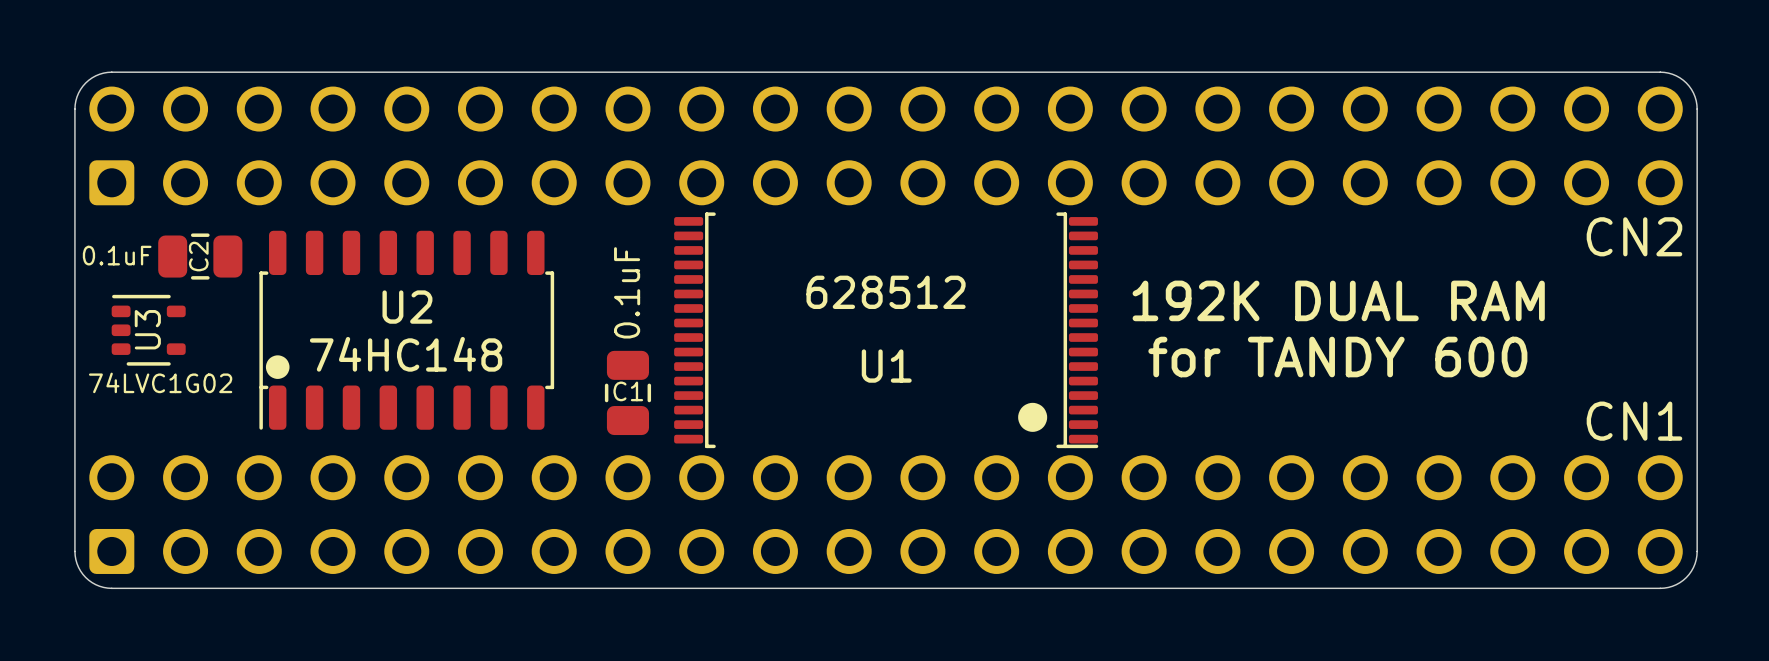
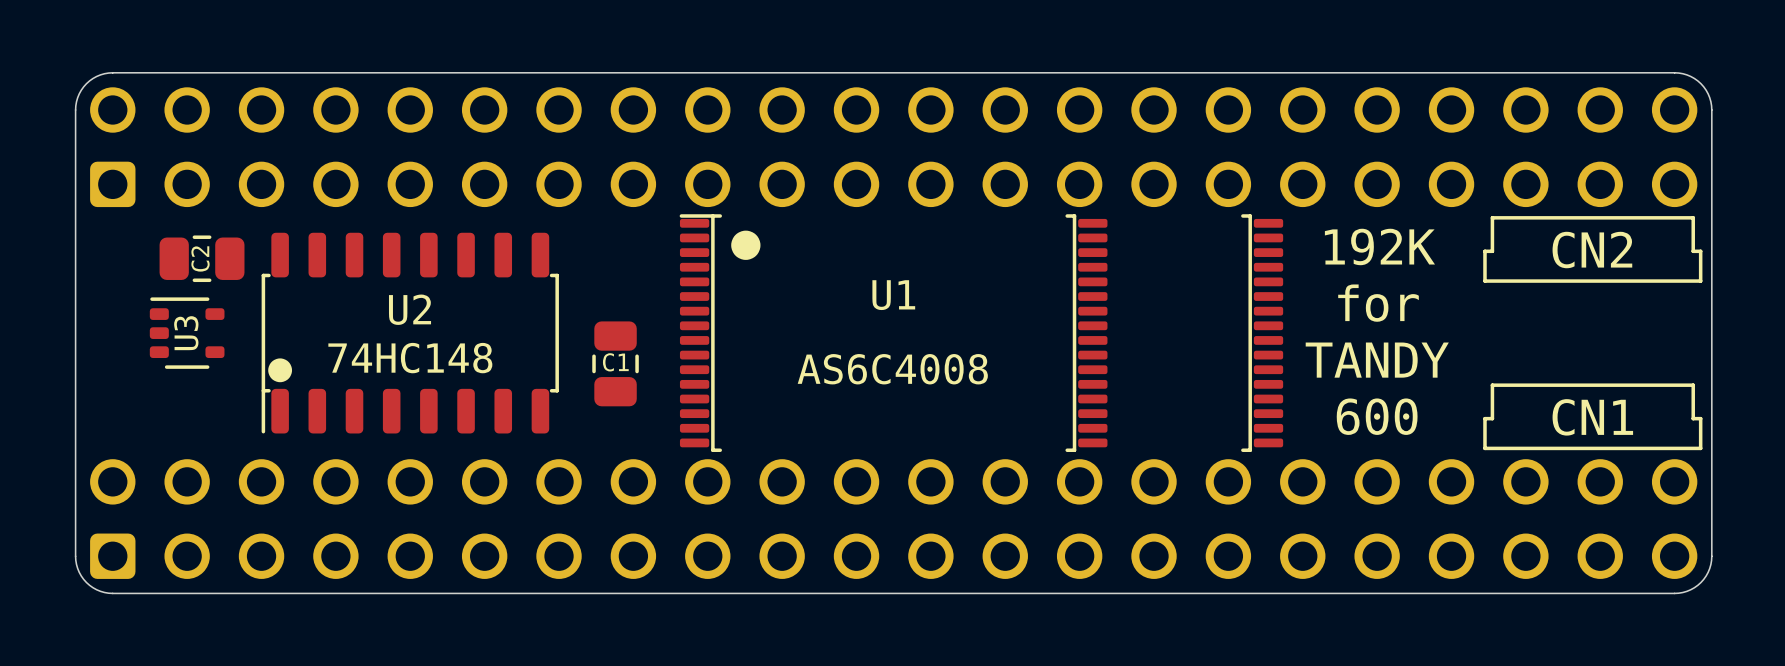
U1 footprint: [674, 212, 1099, 449] -> [679, 214, 1284, 453]
line: none -> (1492, 217) (1492, 251) (1484, 251) (1484, 281) (1700, 281) (1700, 251) (1693, 251) (1693, 217) (1492, 217)
text position: CN2 (1634, 236) -> CN2 (1592, 250)
text: none -> 192K (1379, 246)
C2 value: 0.1uF (117, 255) -> none
C1 value: 0.1uF (627, 292) -> none
U1 value: 628512 (886, 292) -> AS6C4008 (892, 369)
text: 192K DUAL RAM (1338, 300) -> for (1378, 303)
U3 position: (148, 330) -> (187, 333)
text: for TANDY 600 (1337, 357) -> TANDY (1377, 360)
U1 name position: U1 (886, 366) -> U1 (893, 295)
line: none -> (1492, 385) (1492, 418) (1484, 418) (1484, 448) (1700, 448) (1700, 418) (1693, 418) (1693, 385) (1492, 385)
U3 value: 74LVC1G02 (160, 382) -> none
C1 position: (627, 392) -> (615, 363)
text: none -> 600 (1377, 416)
text position: CN1 (1634, 421) -> CN1 (1592, 417)

